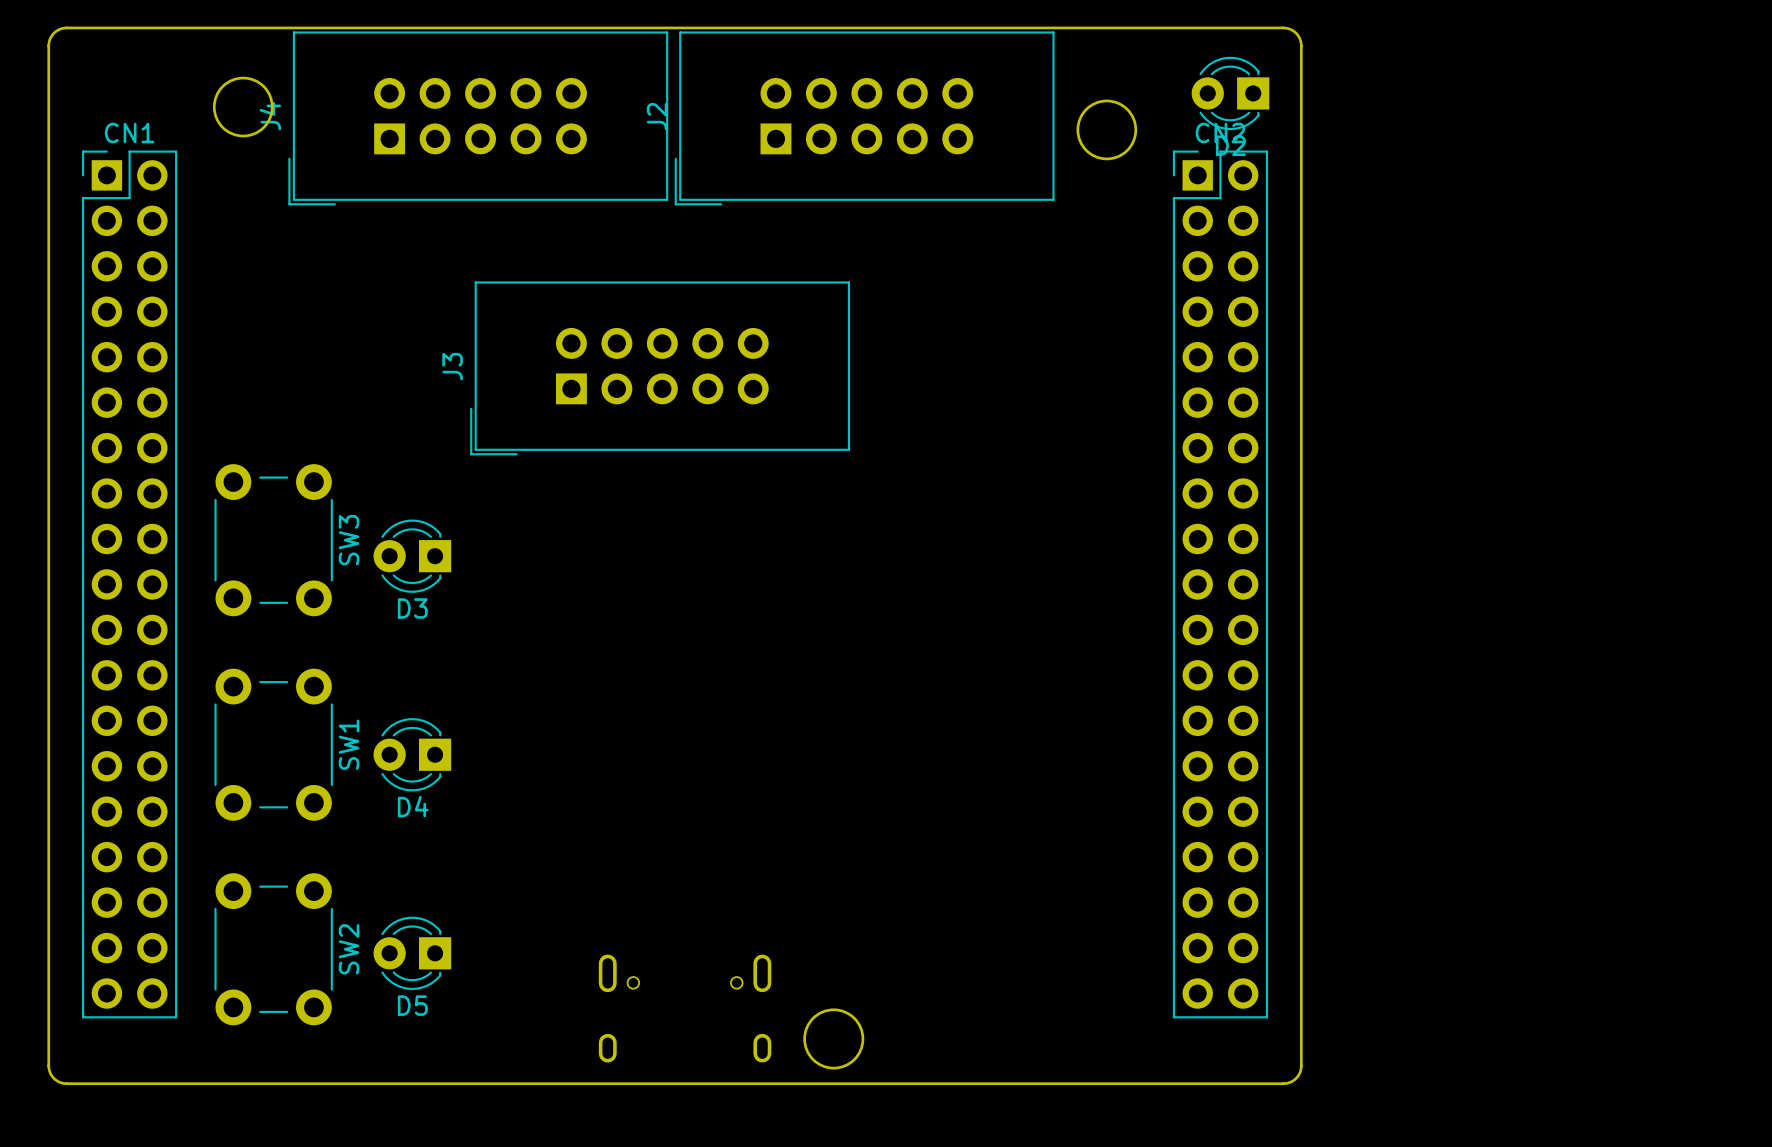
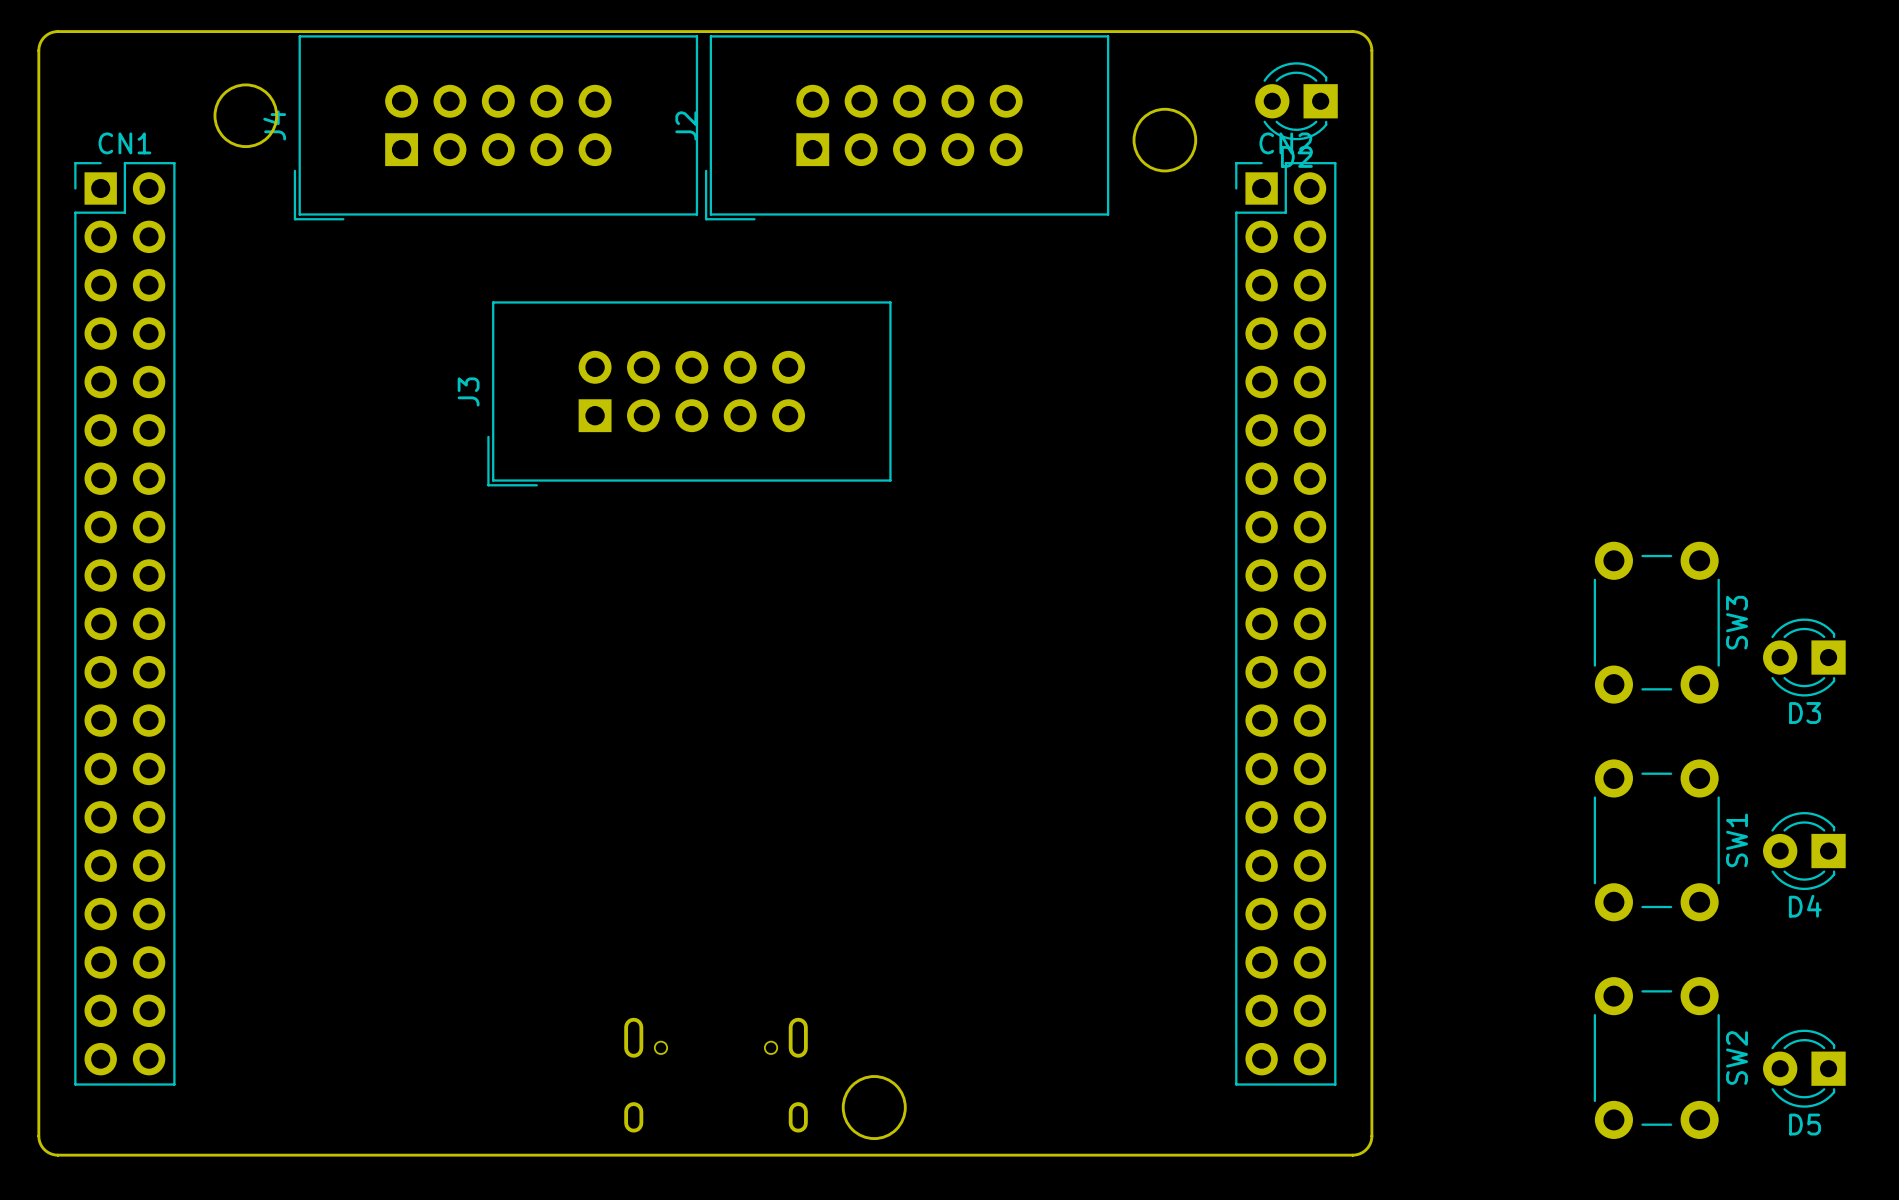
SW3 position: (273, 540) -> (1656, 622)
D3 position: (412, 556) -> (1804, 657)
D4 footprint: [373, 718, 452, 792] -> [1763, 812, 1846, 891]
SW1 position: (273, 744) -> (1656, 840)
SW2 position: (273, 949) -> (1656, 1058)
D5 position: (412, 953) -> (1804, 1068)

